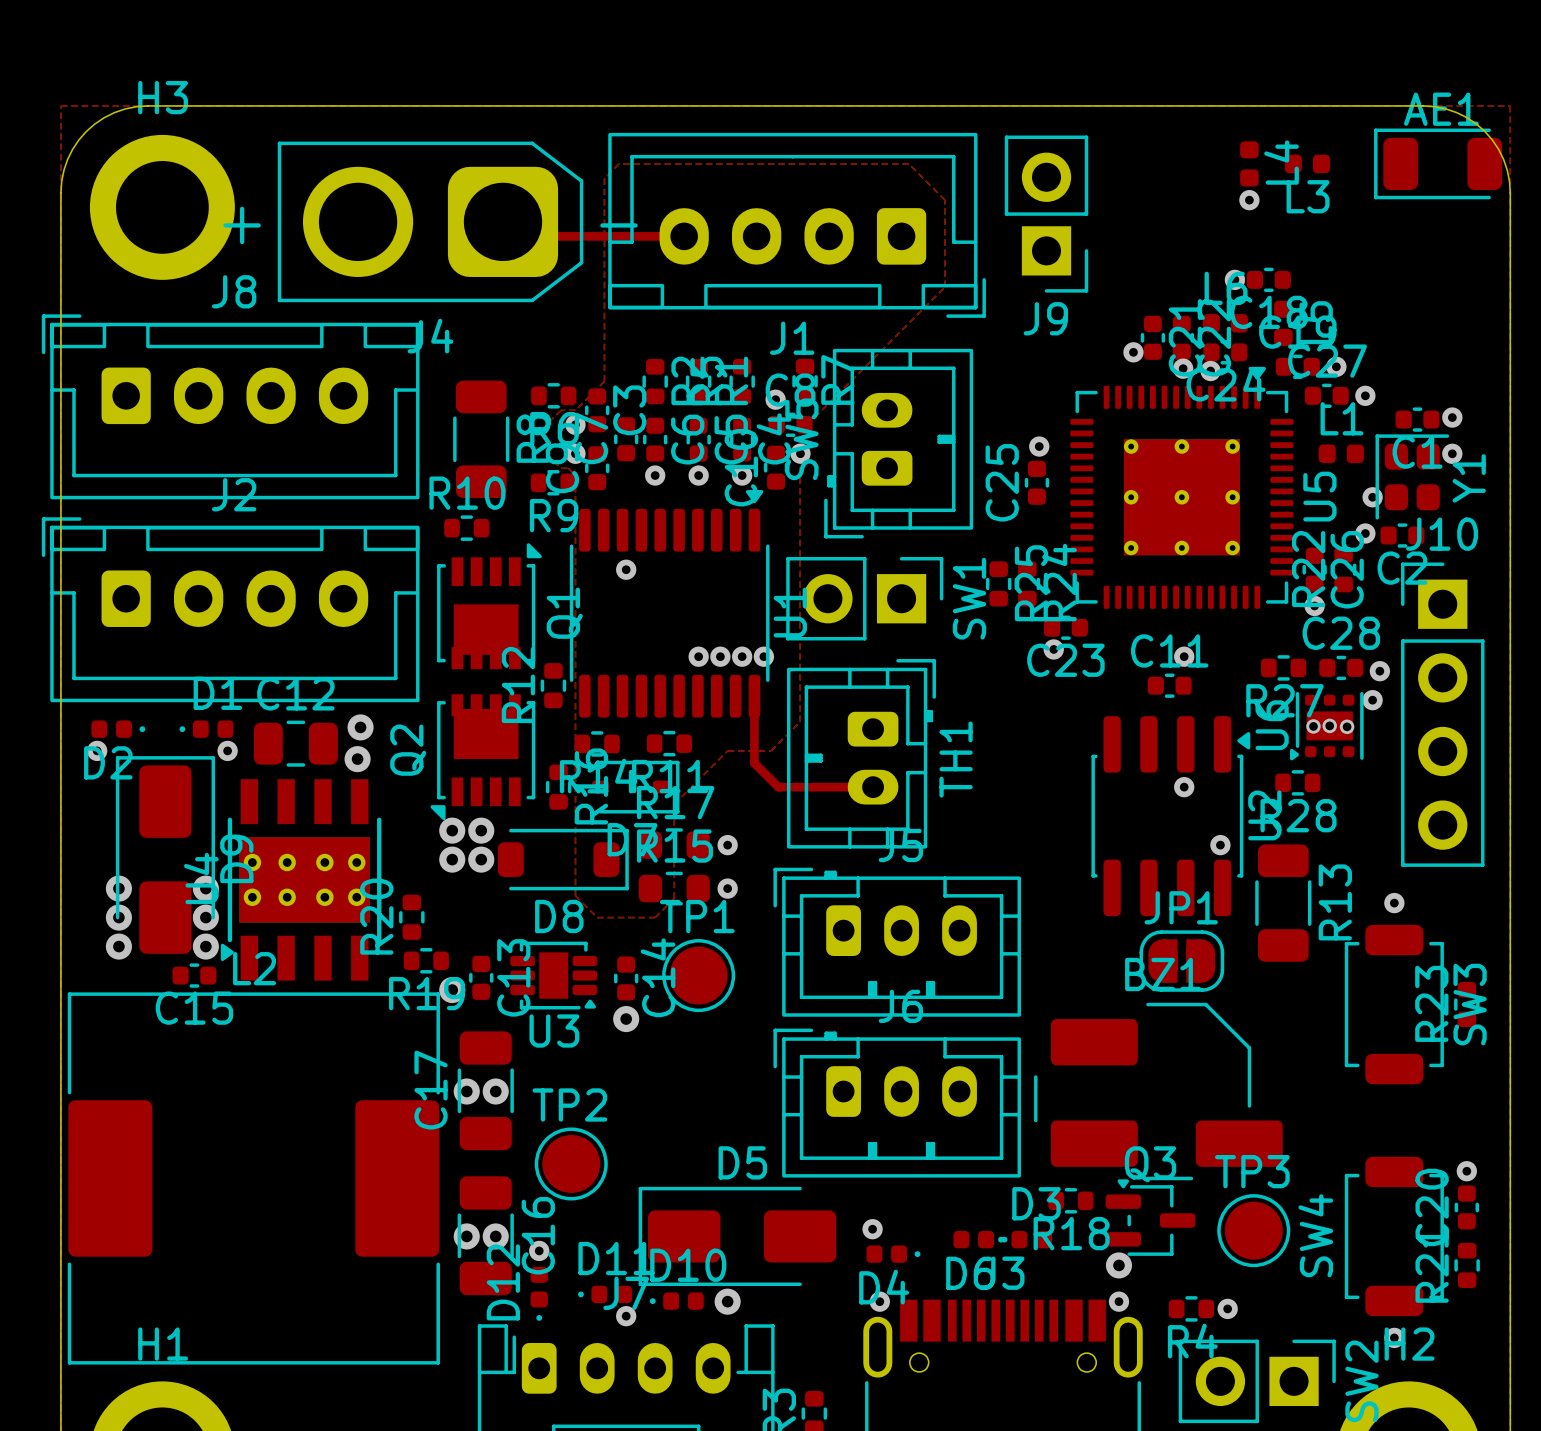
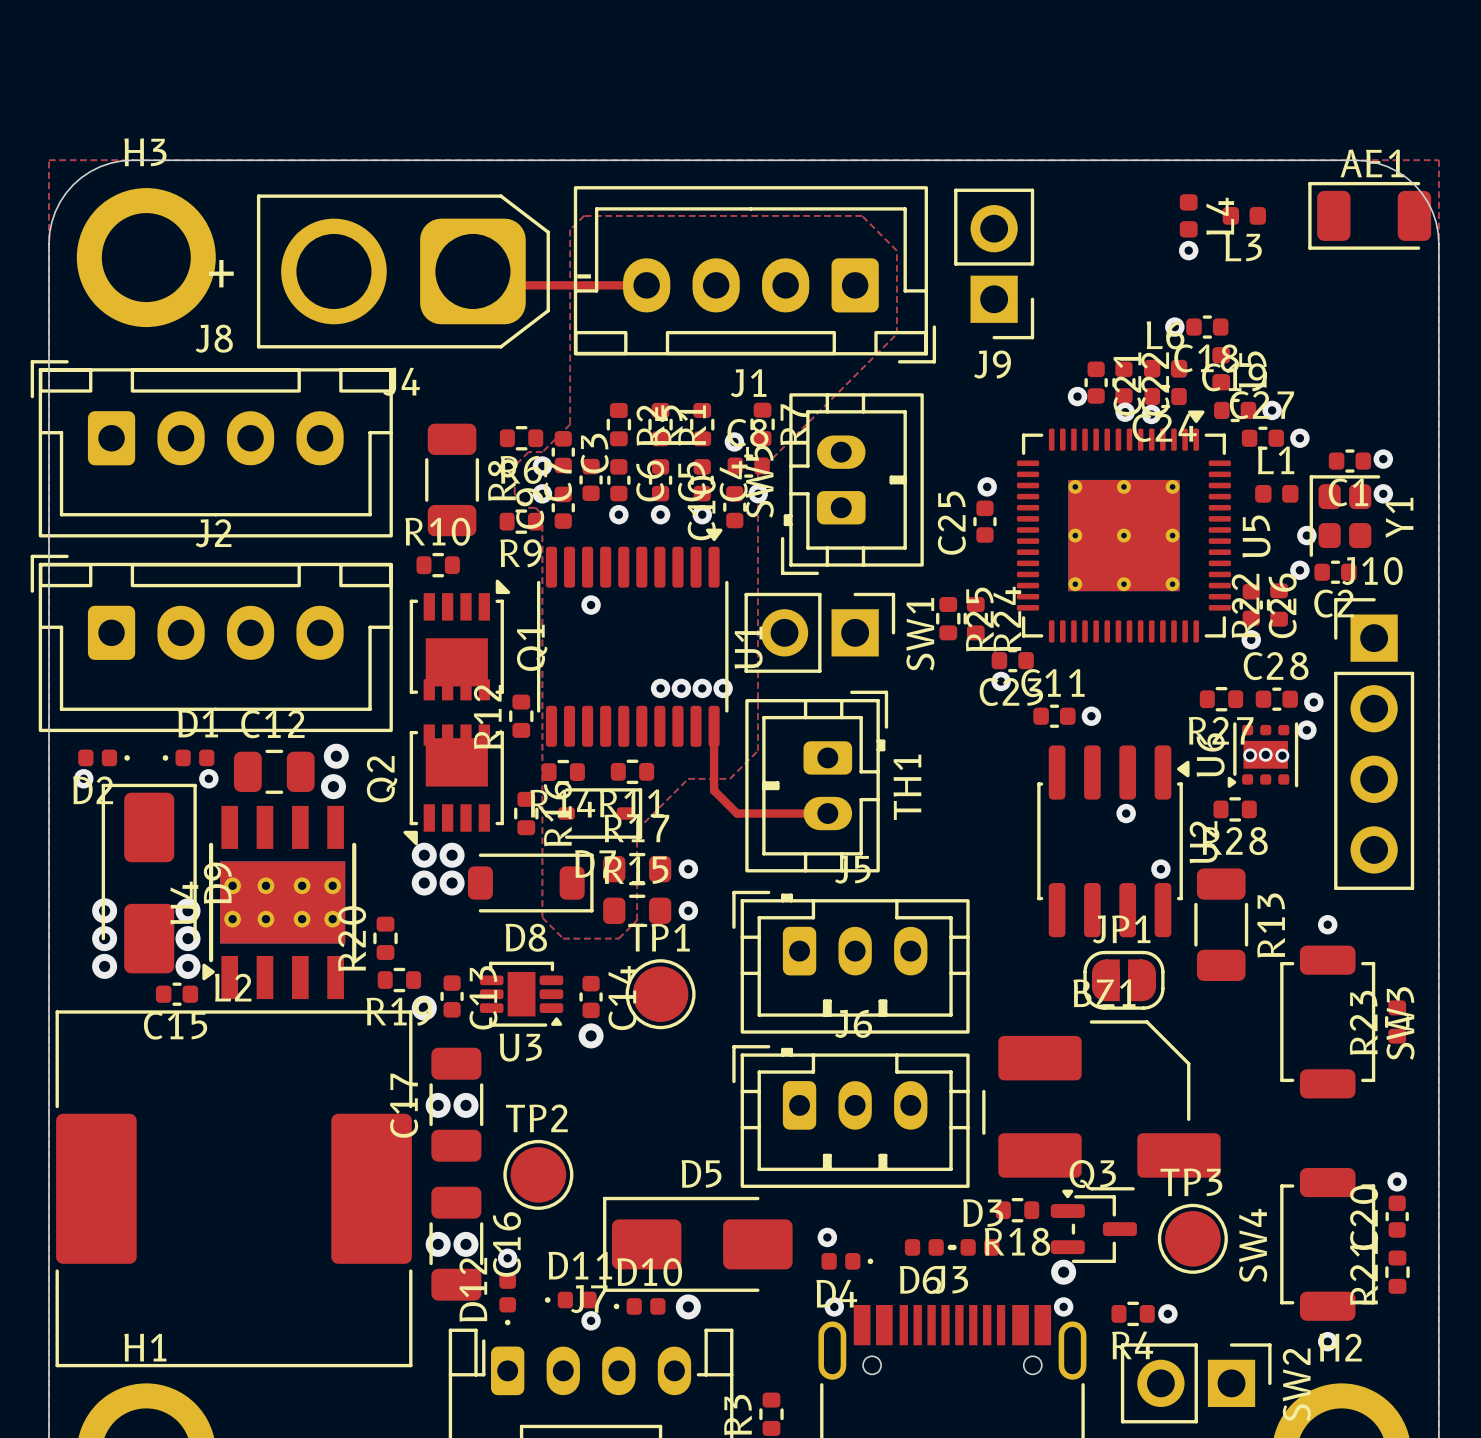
via position: (1184, 656) -> (1091, 716)
C11 position: (1169, 685) -> (1054, 716)

